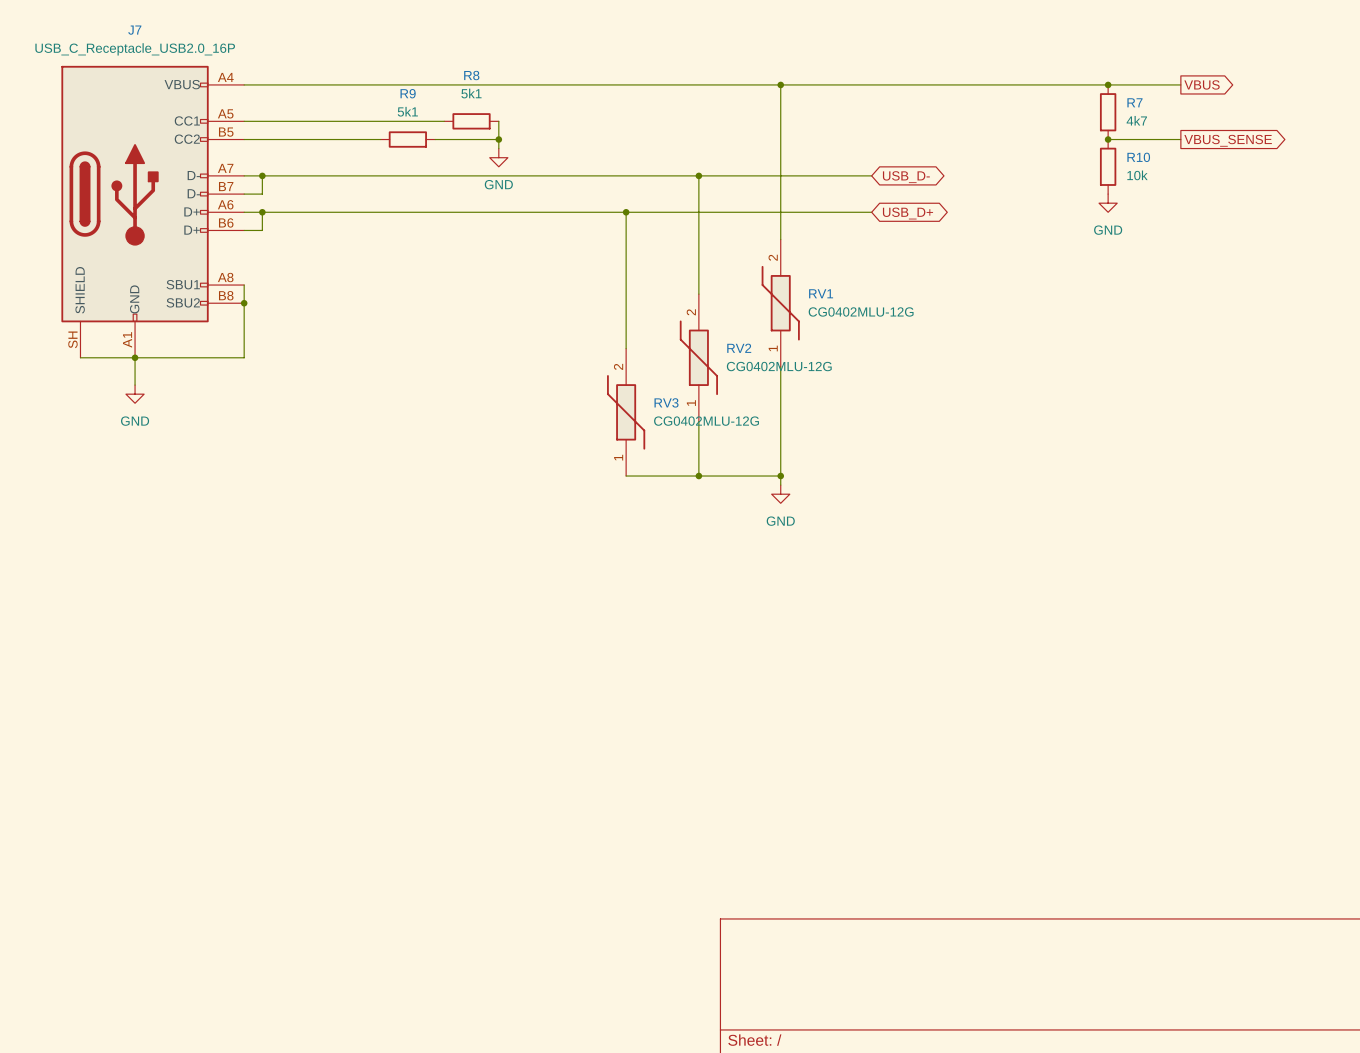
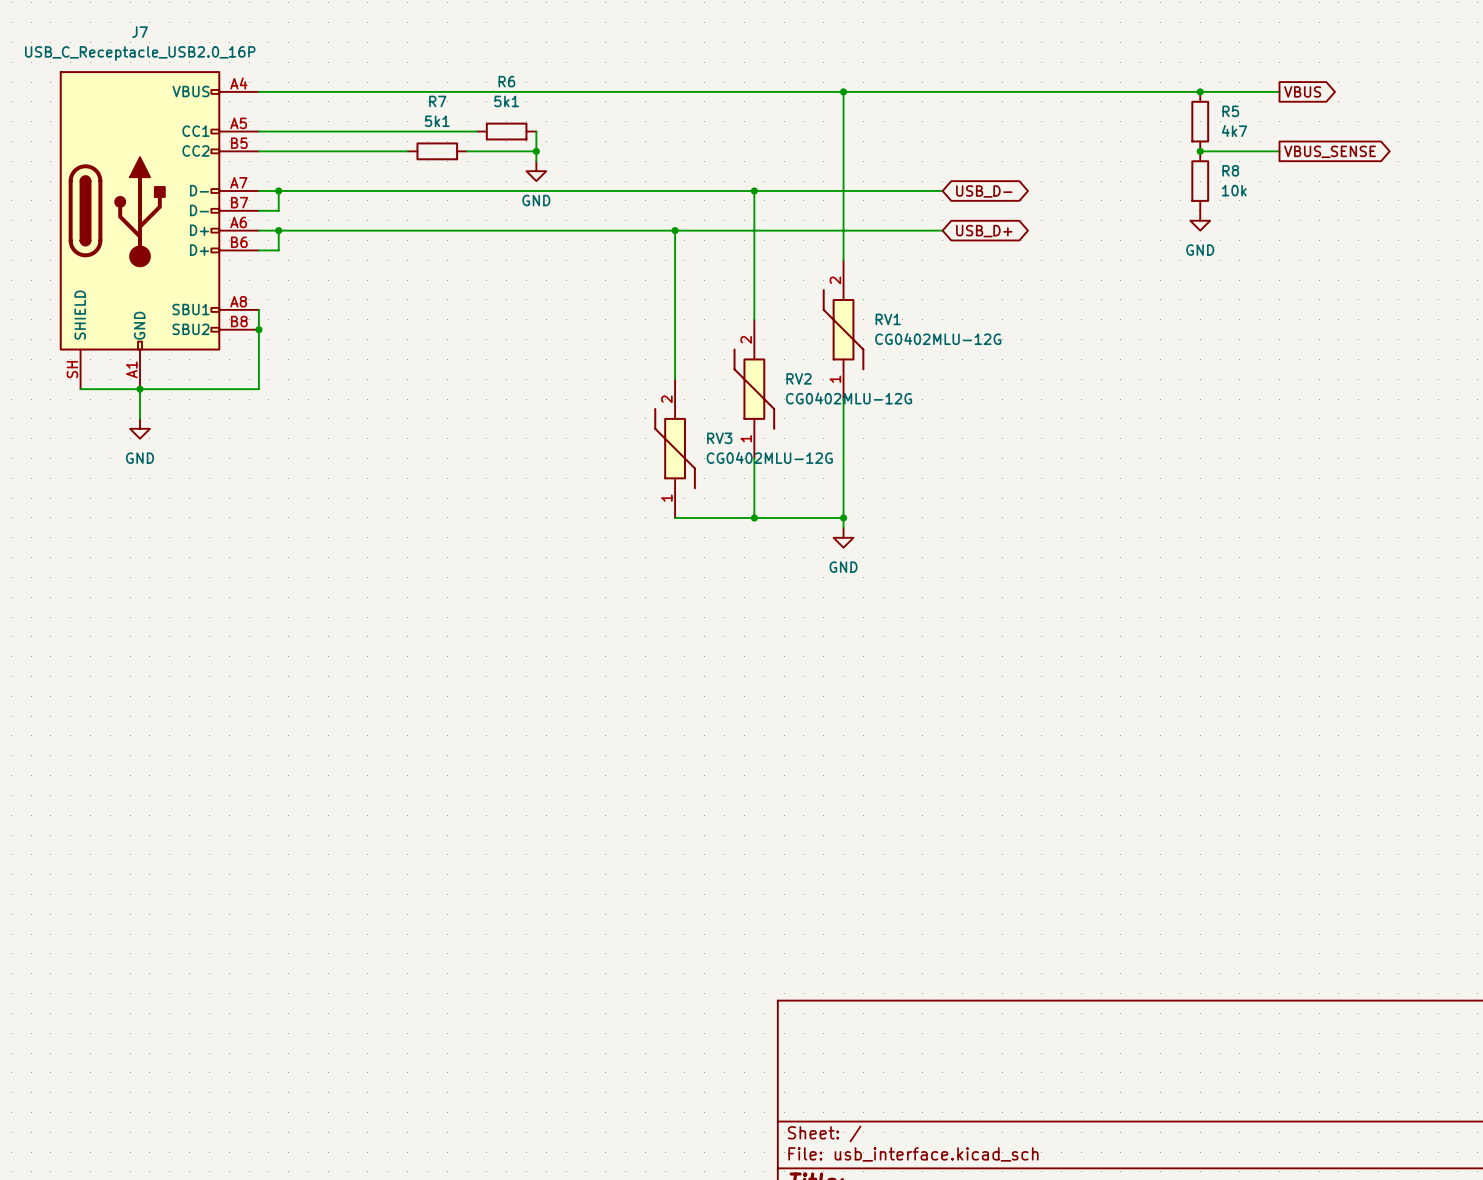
R8 name: R8 (471, 75) -> R6 (506, 81)
R9 name: R9 (408, 93) -> R7 (437, 101)
R7 name: R7 (1134, 102) -> R5 (1230, 111)
R10 name: R10 (1138, 157) -> R8 (1230, 170)

